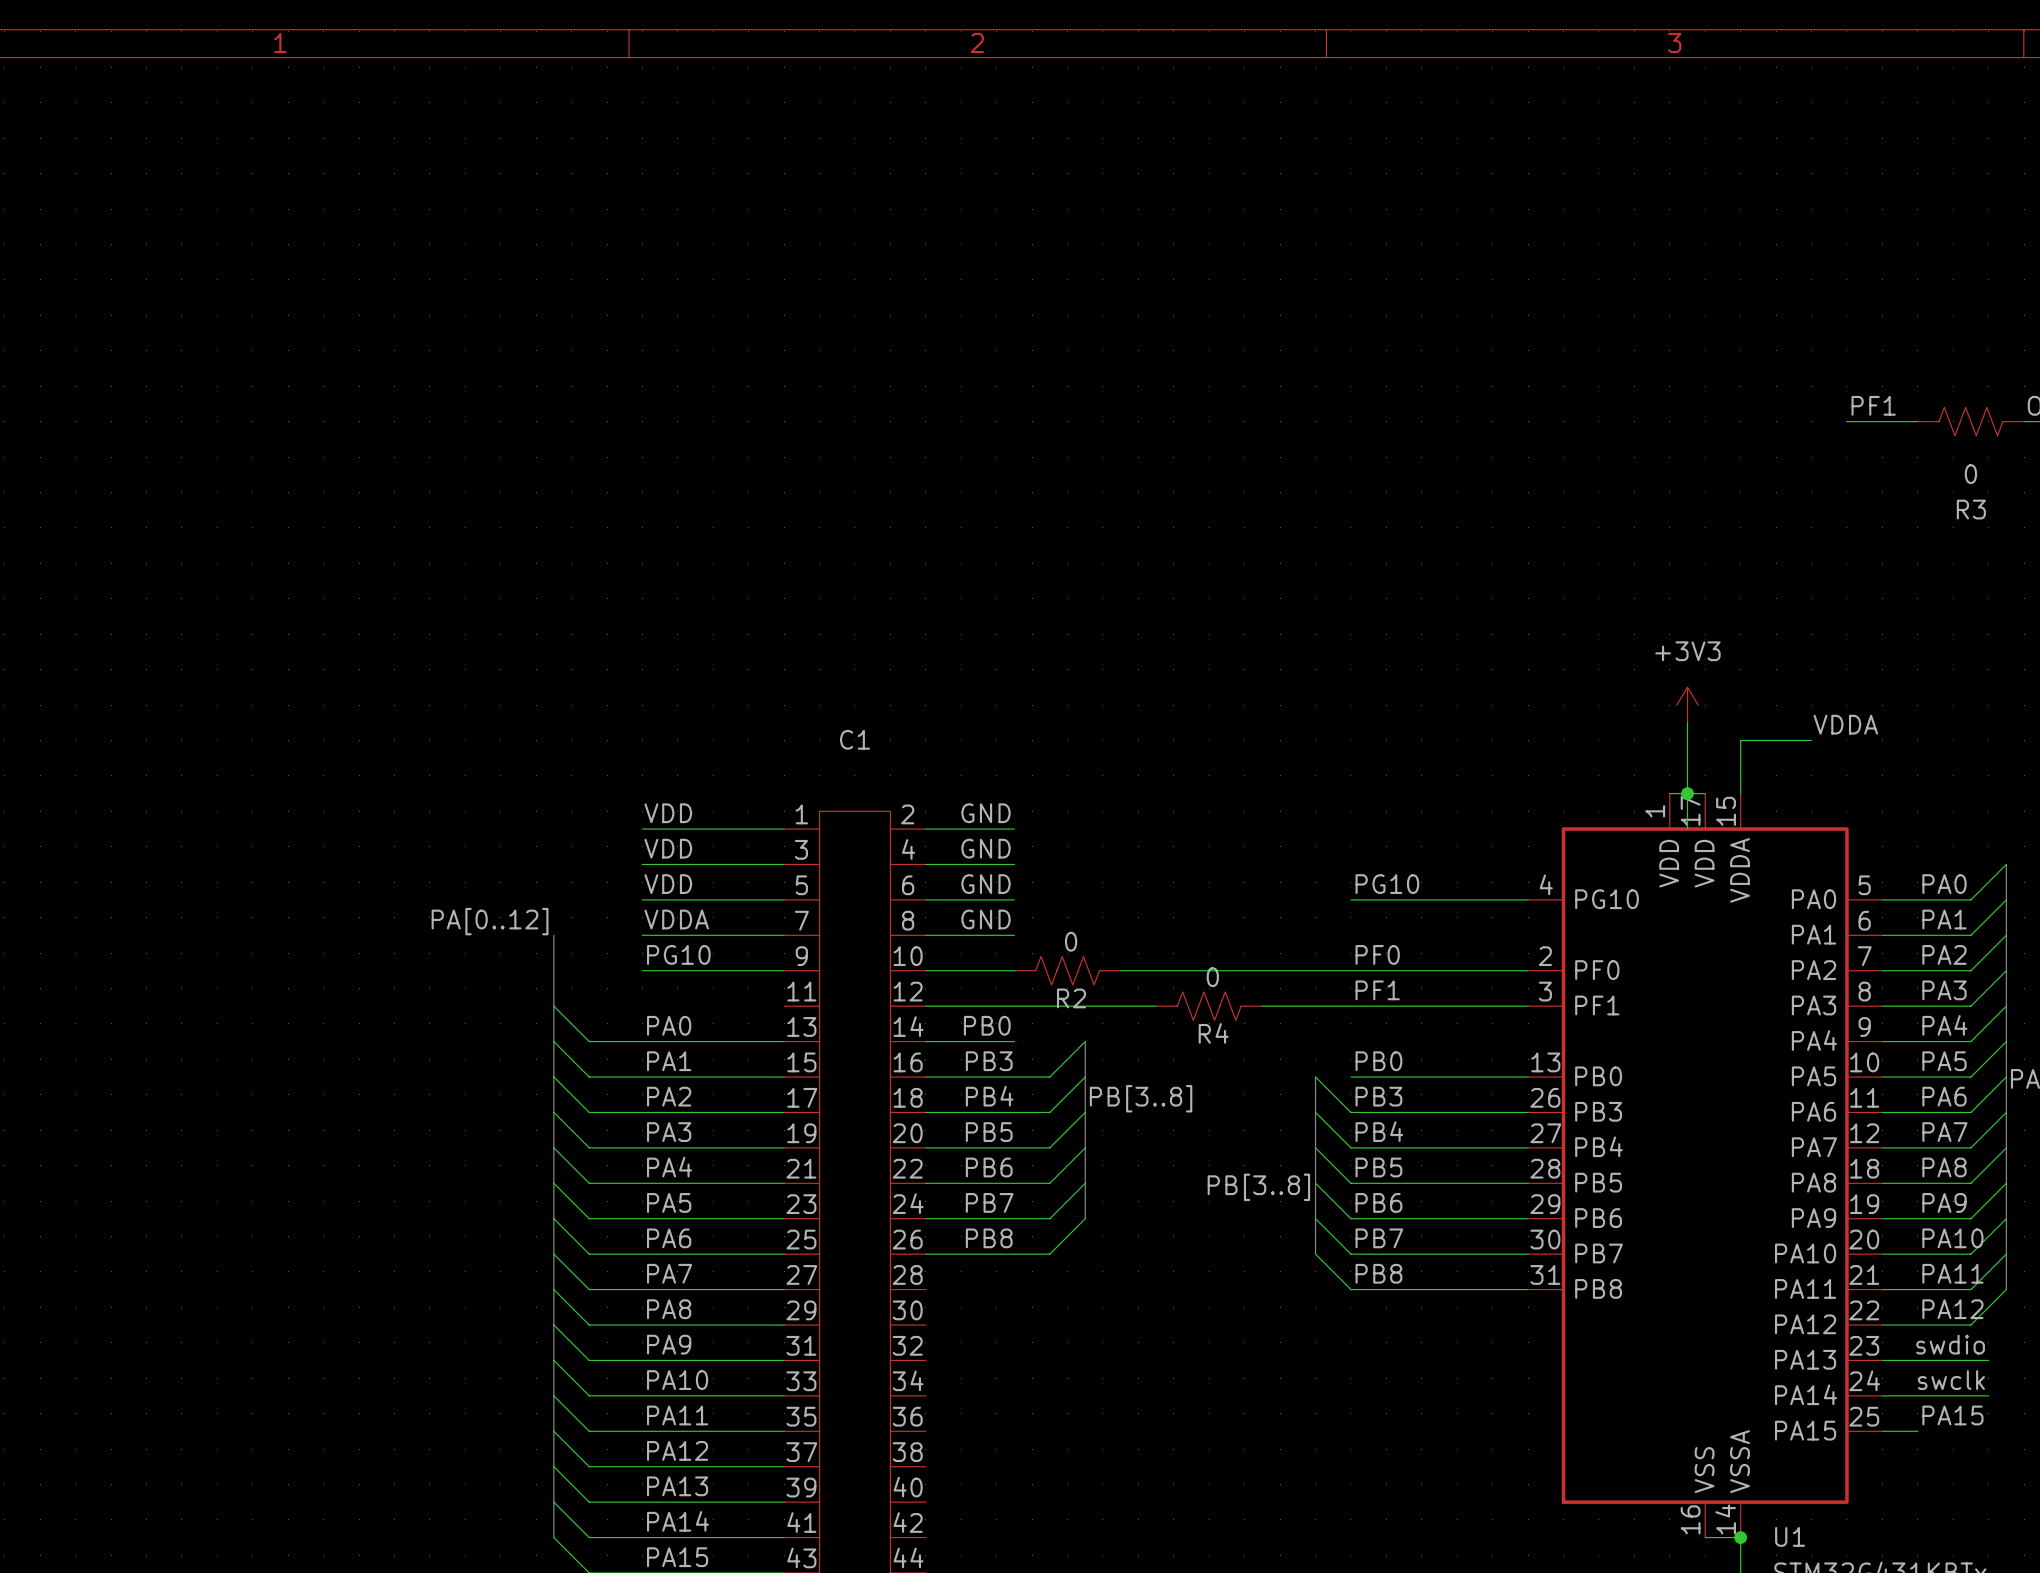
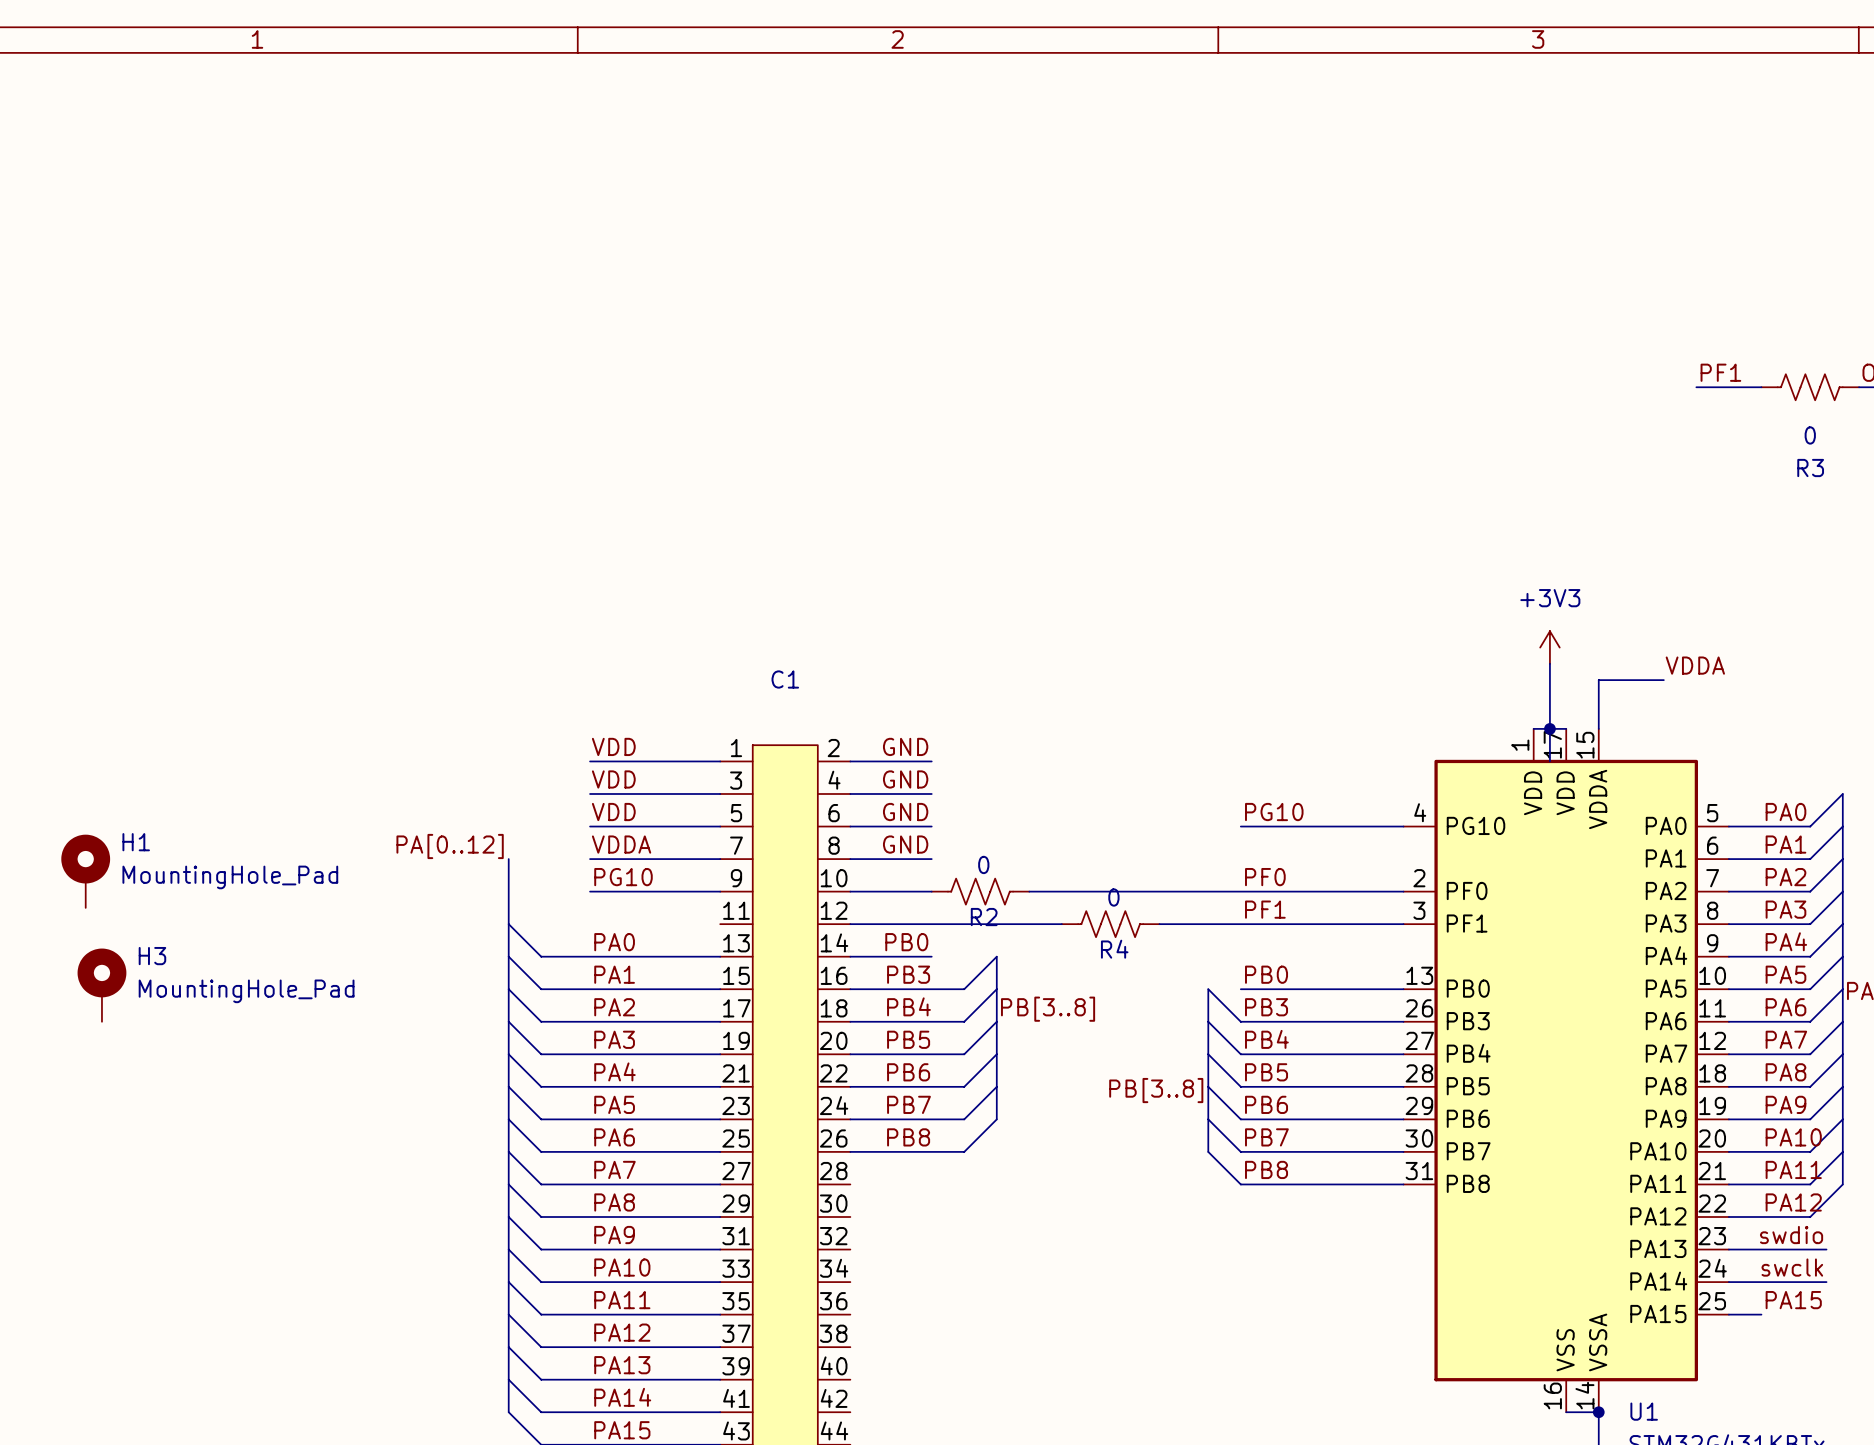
H1: none -> MountingHole_Pad (85, 871)
H3: none -> MountingHole_Pad (101, 985)

